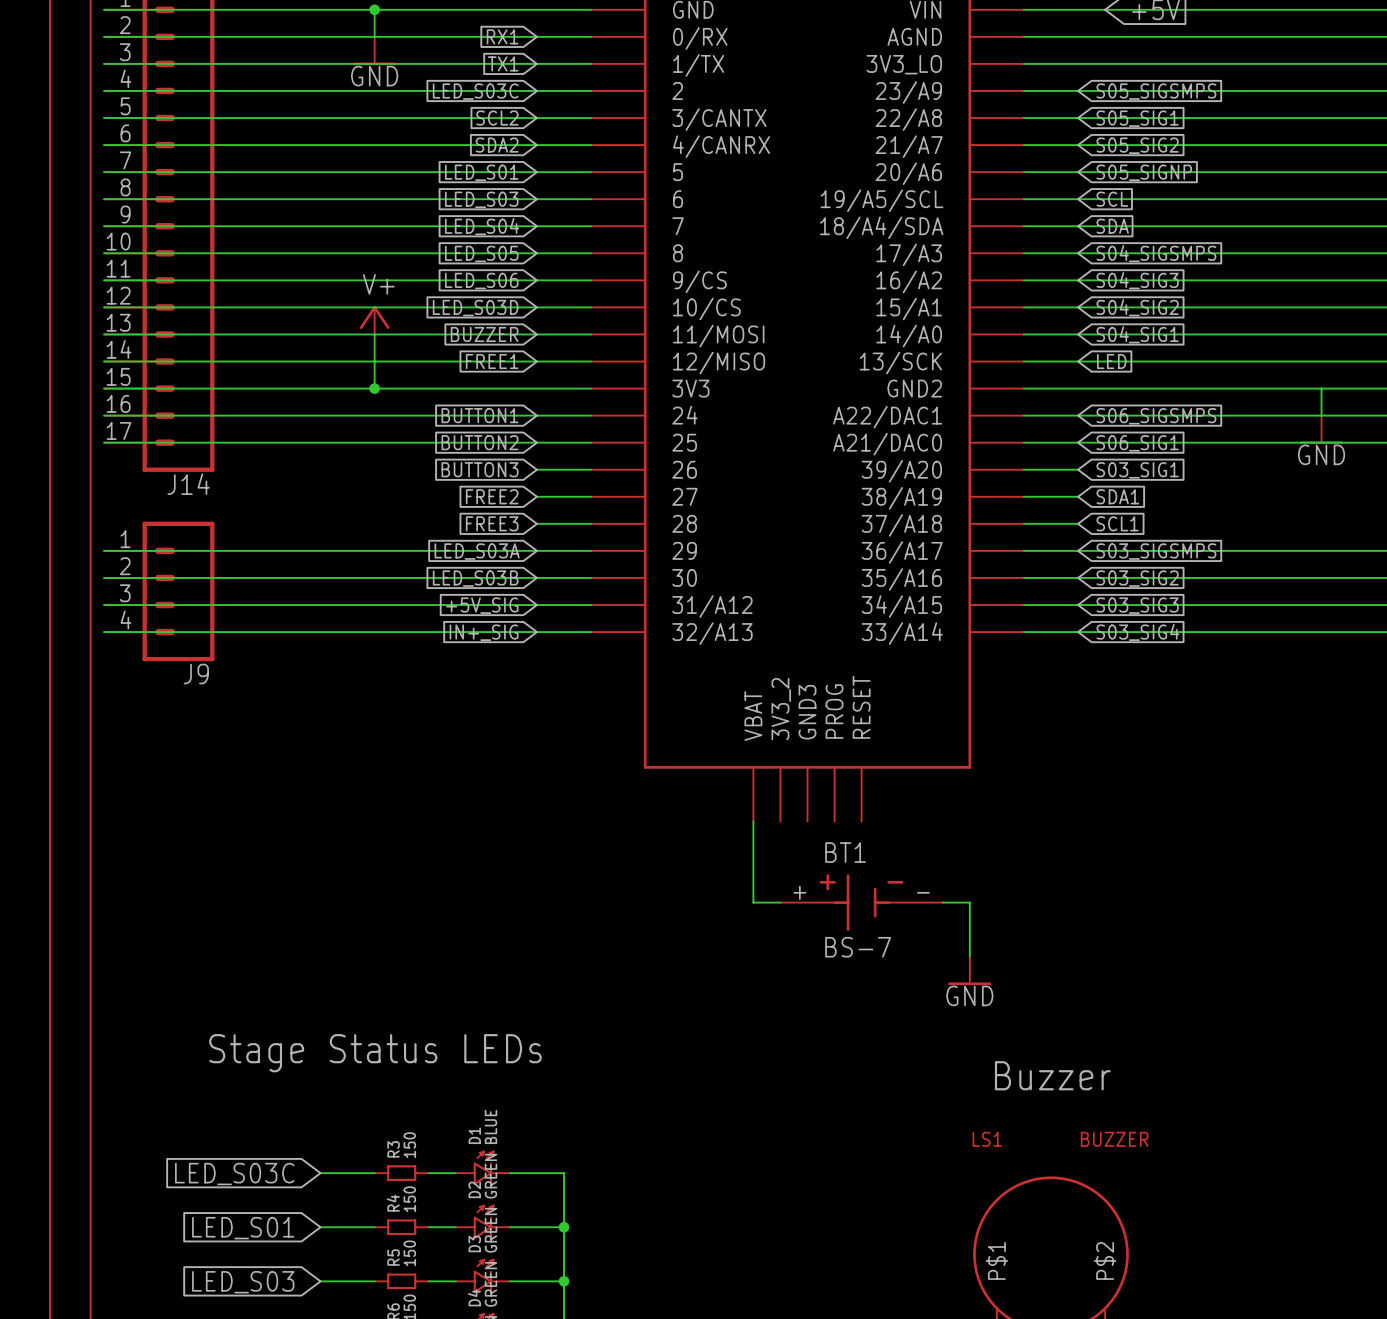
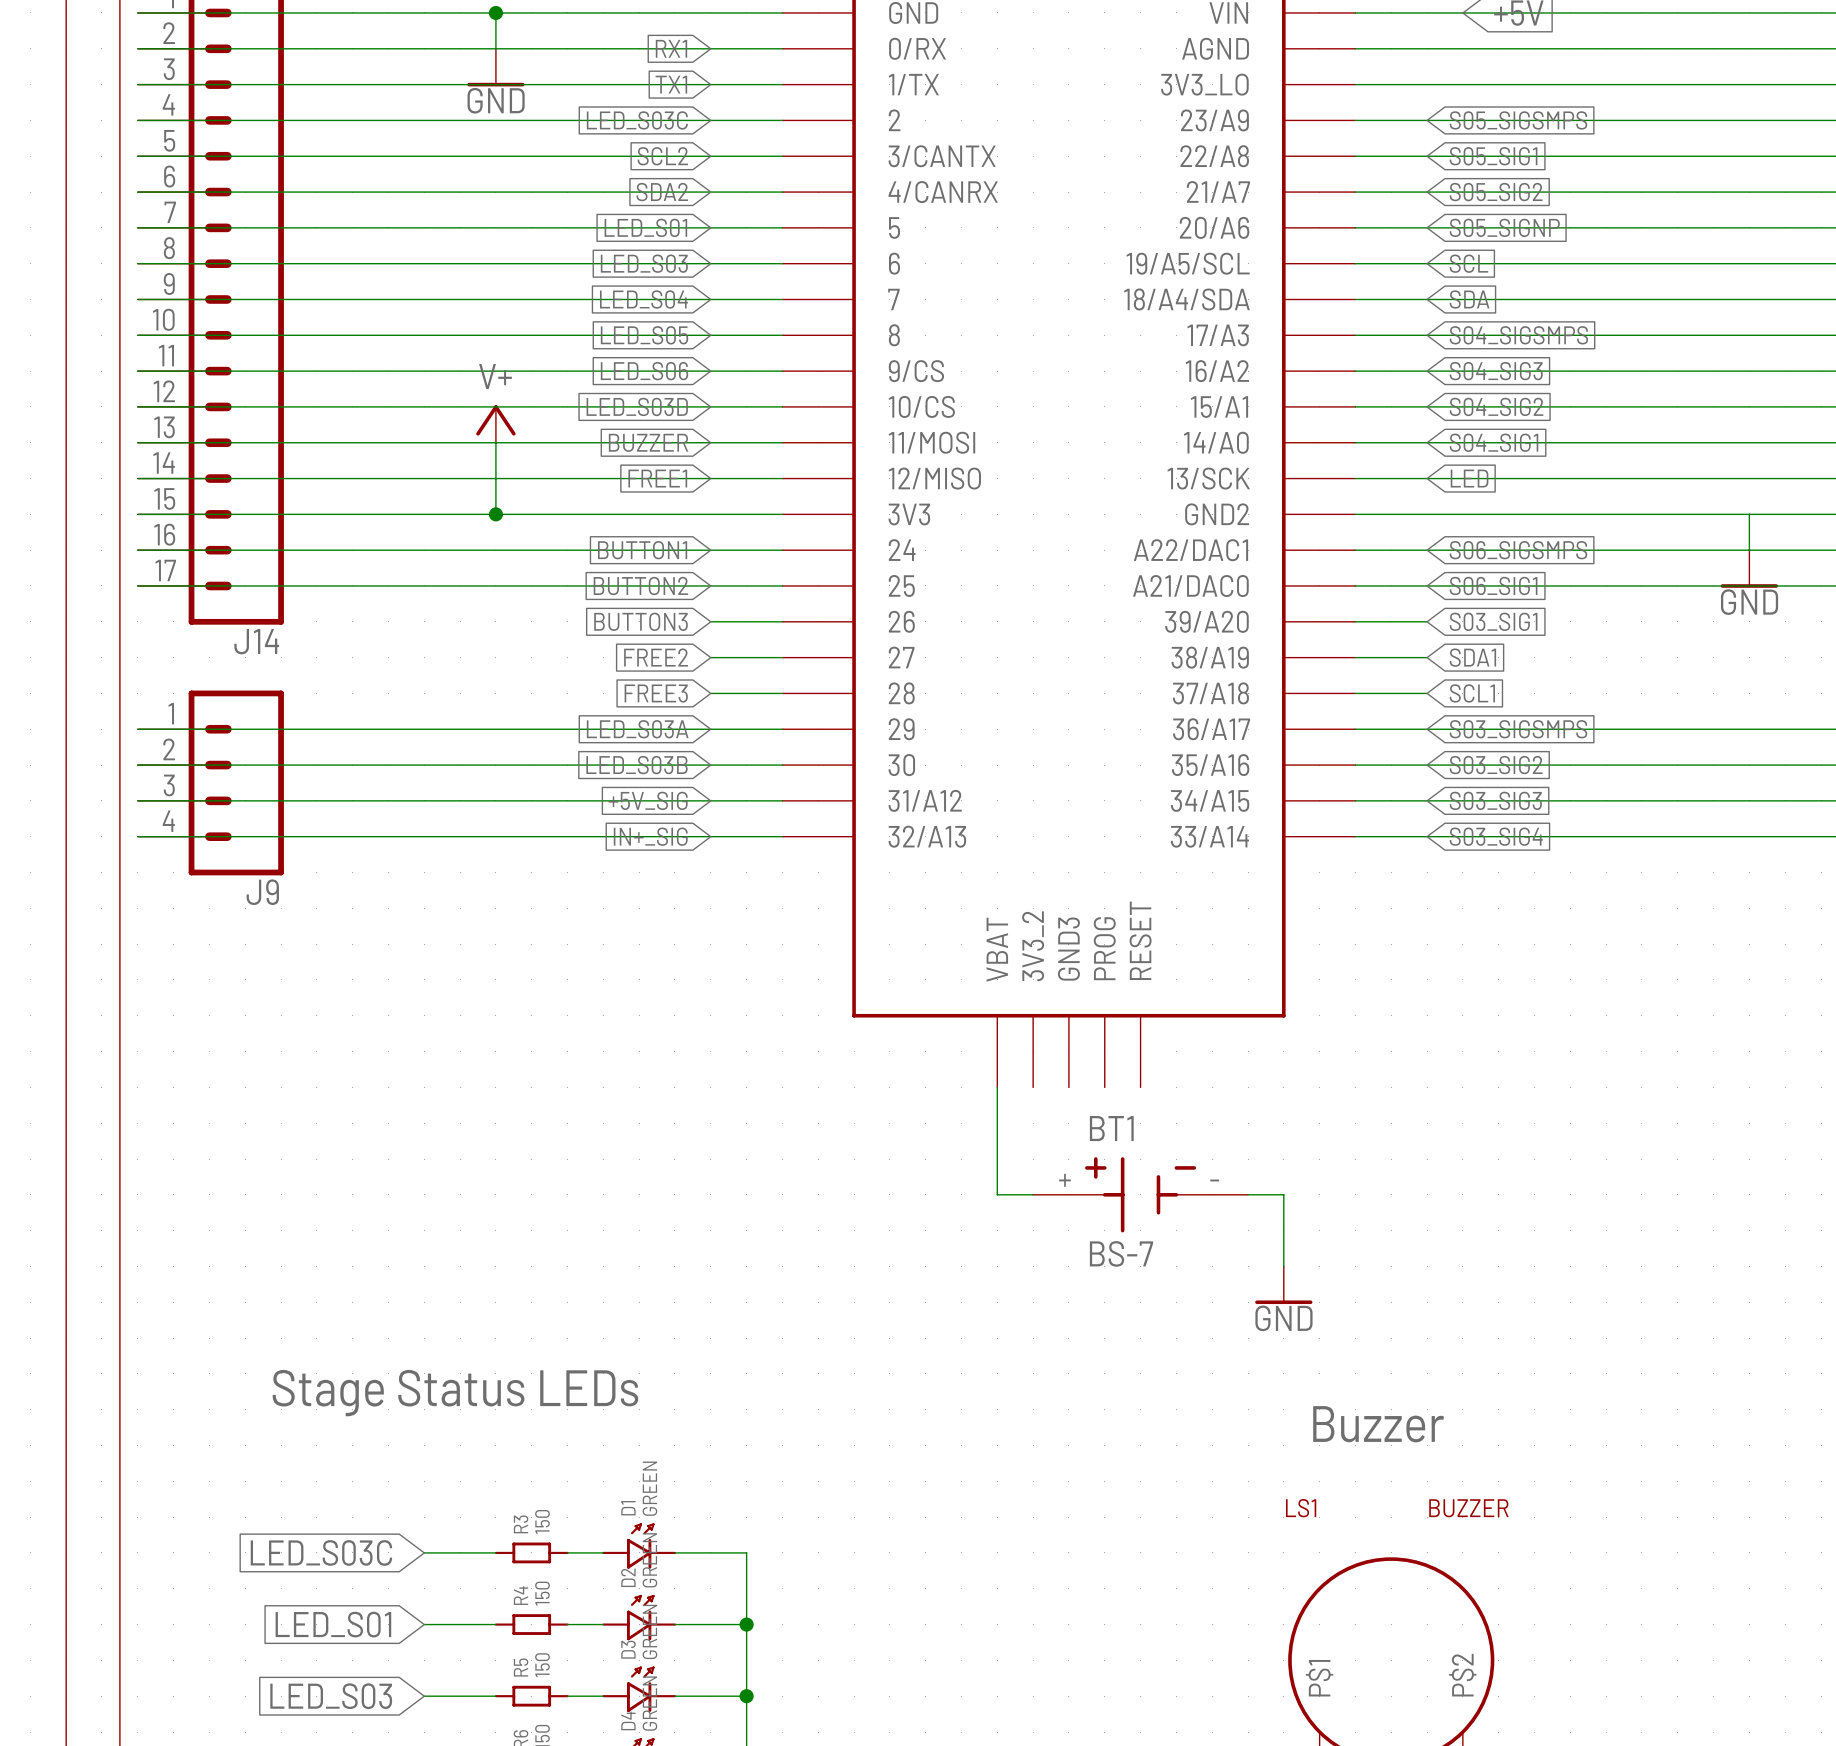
D1 value: BLUE (490, 1126) -> GREEN (649, 1488)

